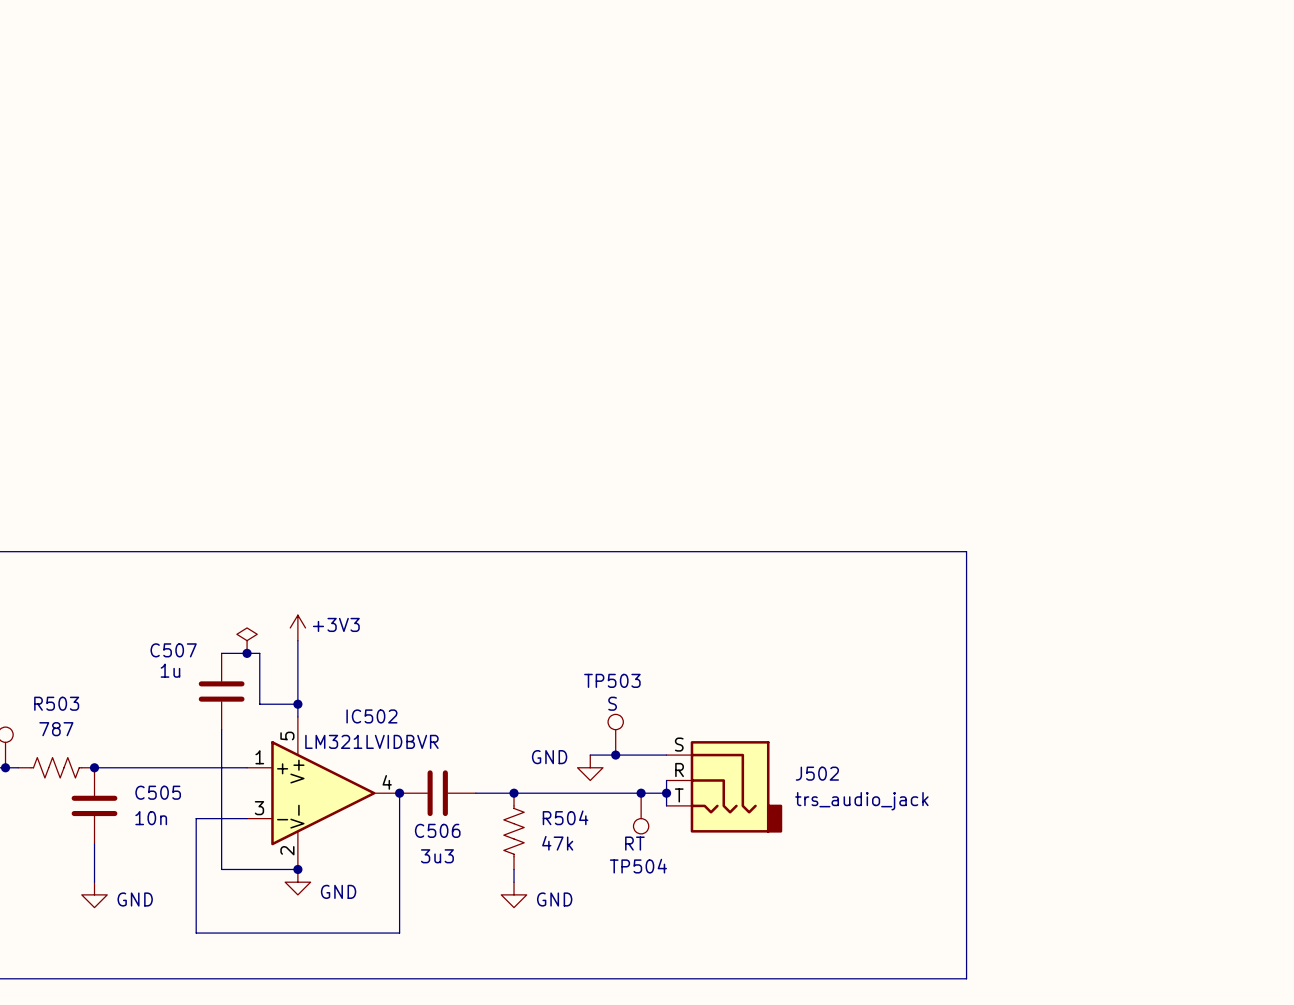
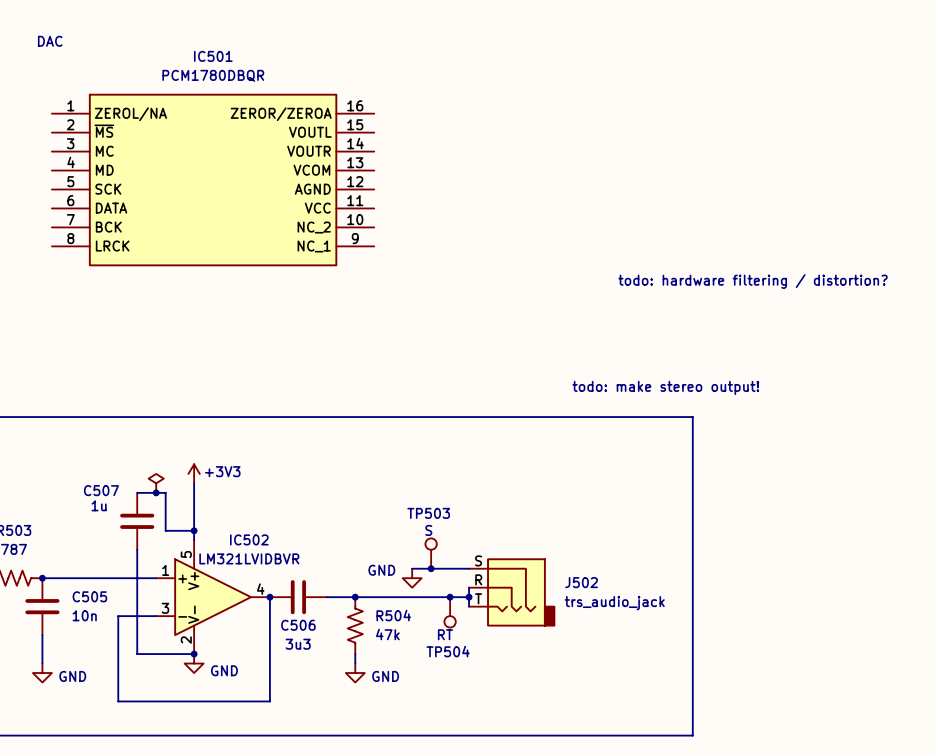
text: none -> DAC (50, 41)
IC501: none -> PCM1780DBQR (213, 180)
text: none -> todo: hardware filtering / distortion? (753, 281)
text: none -> todo: make stereo output! (665, 387)

